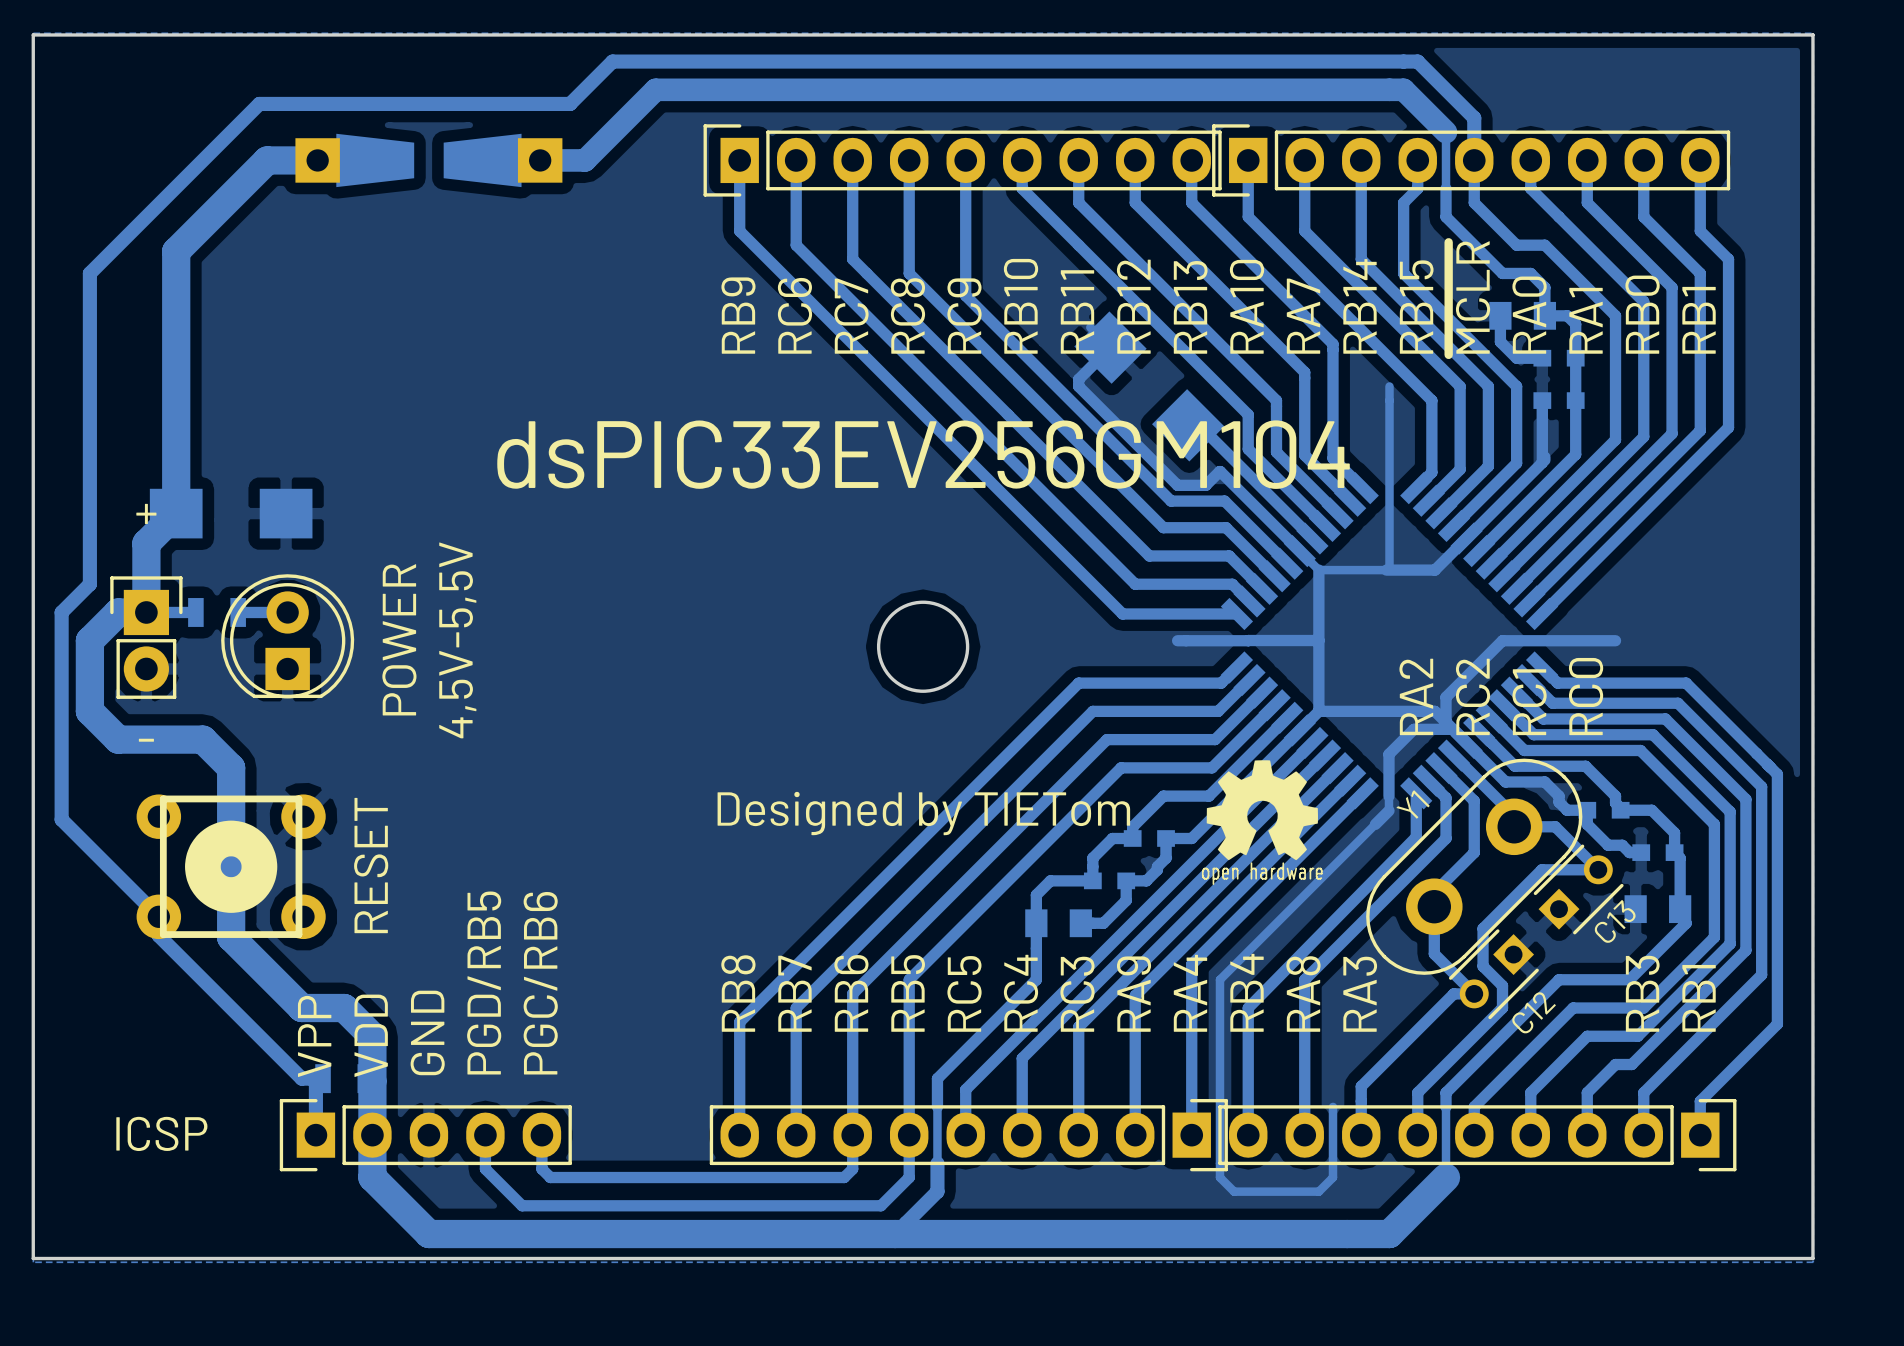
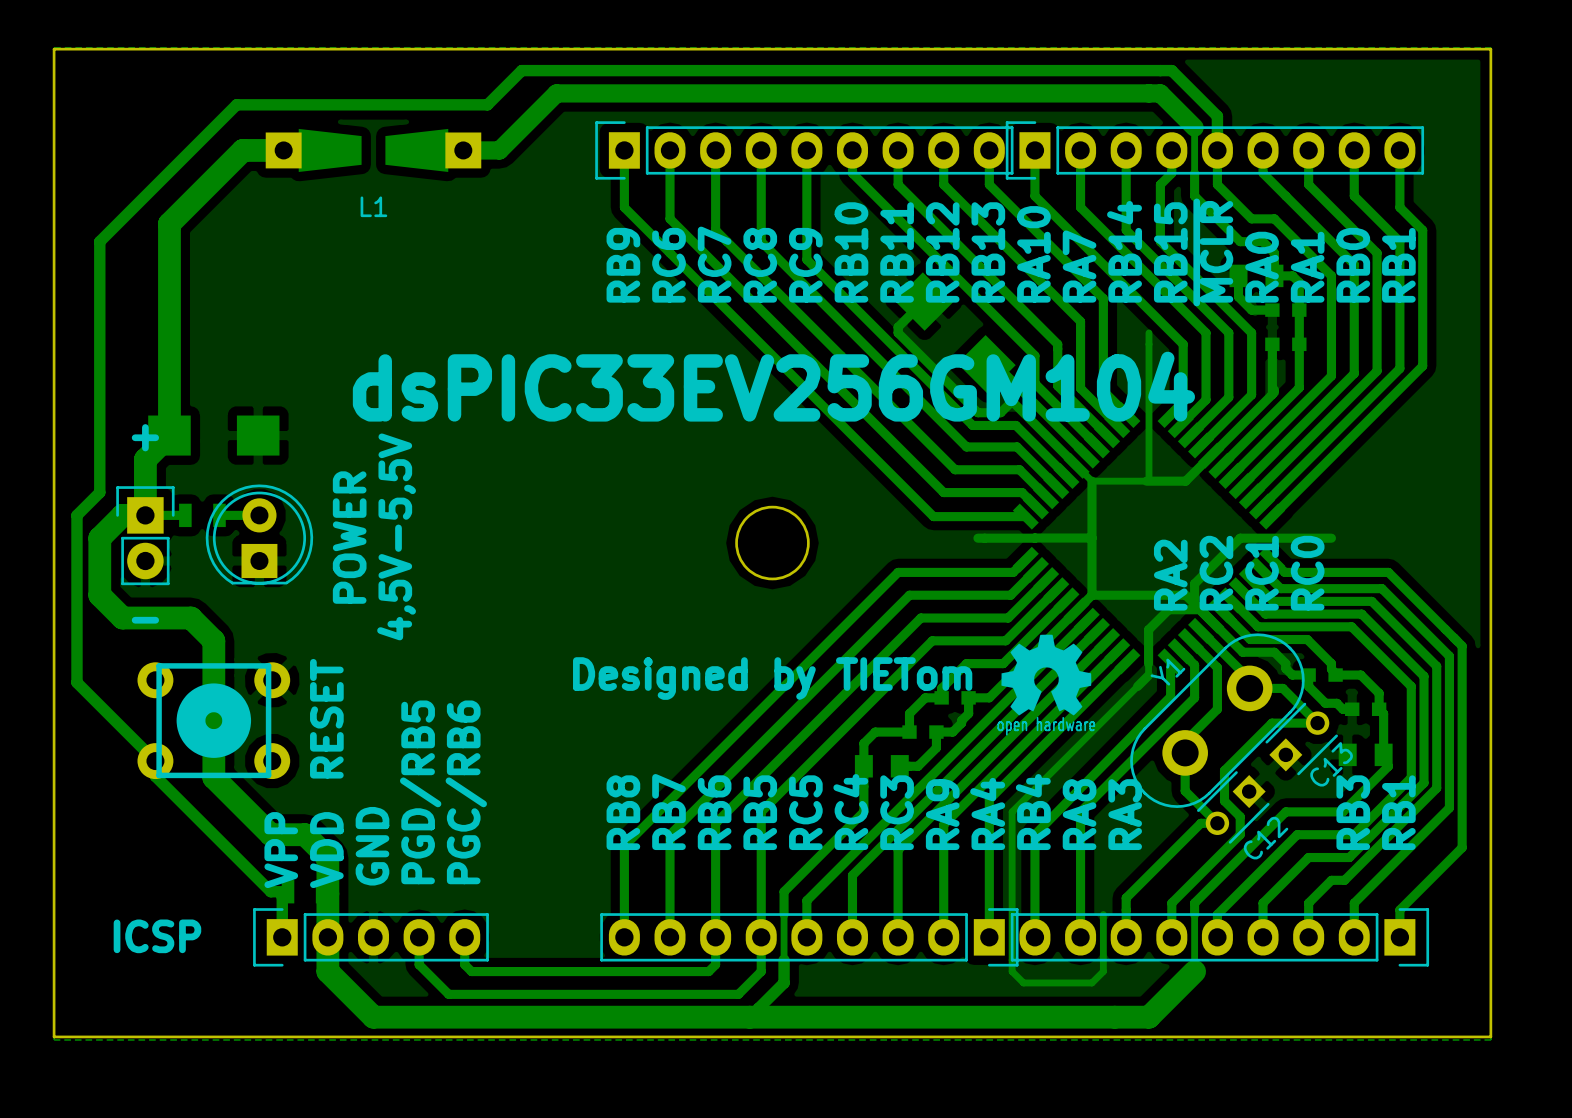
L1 name: none -> L1 (373, 206)

